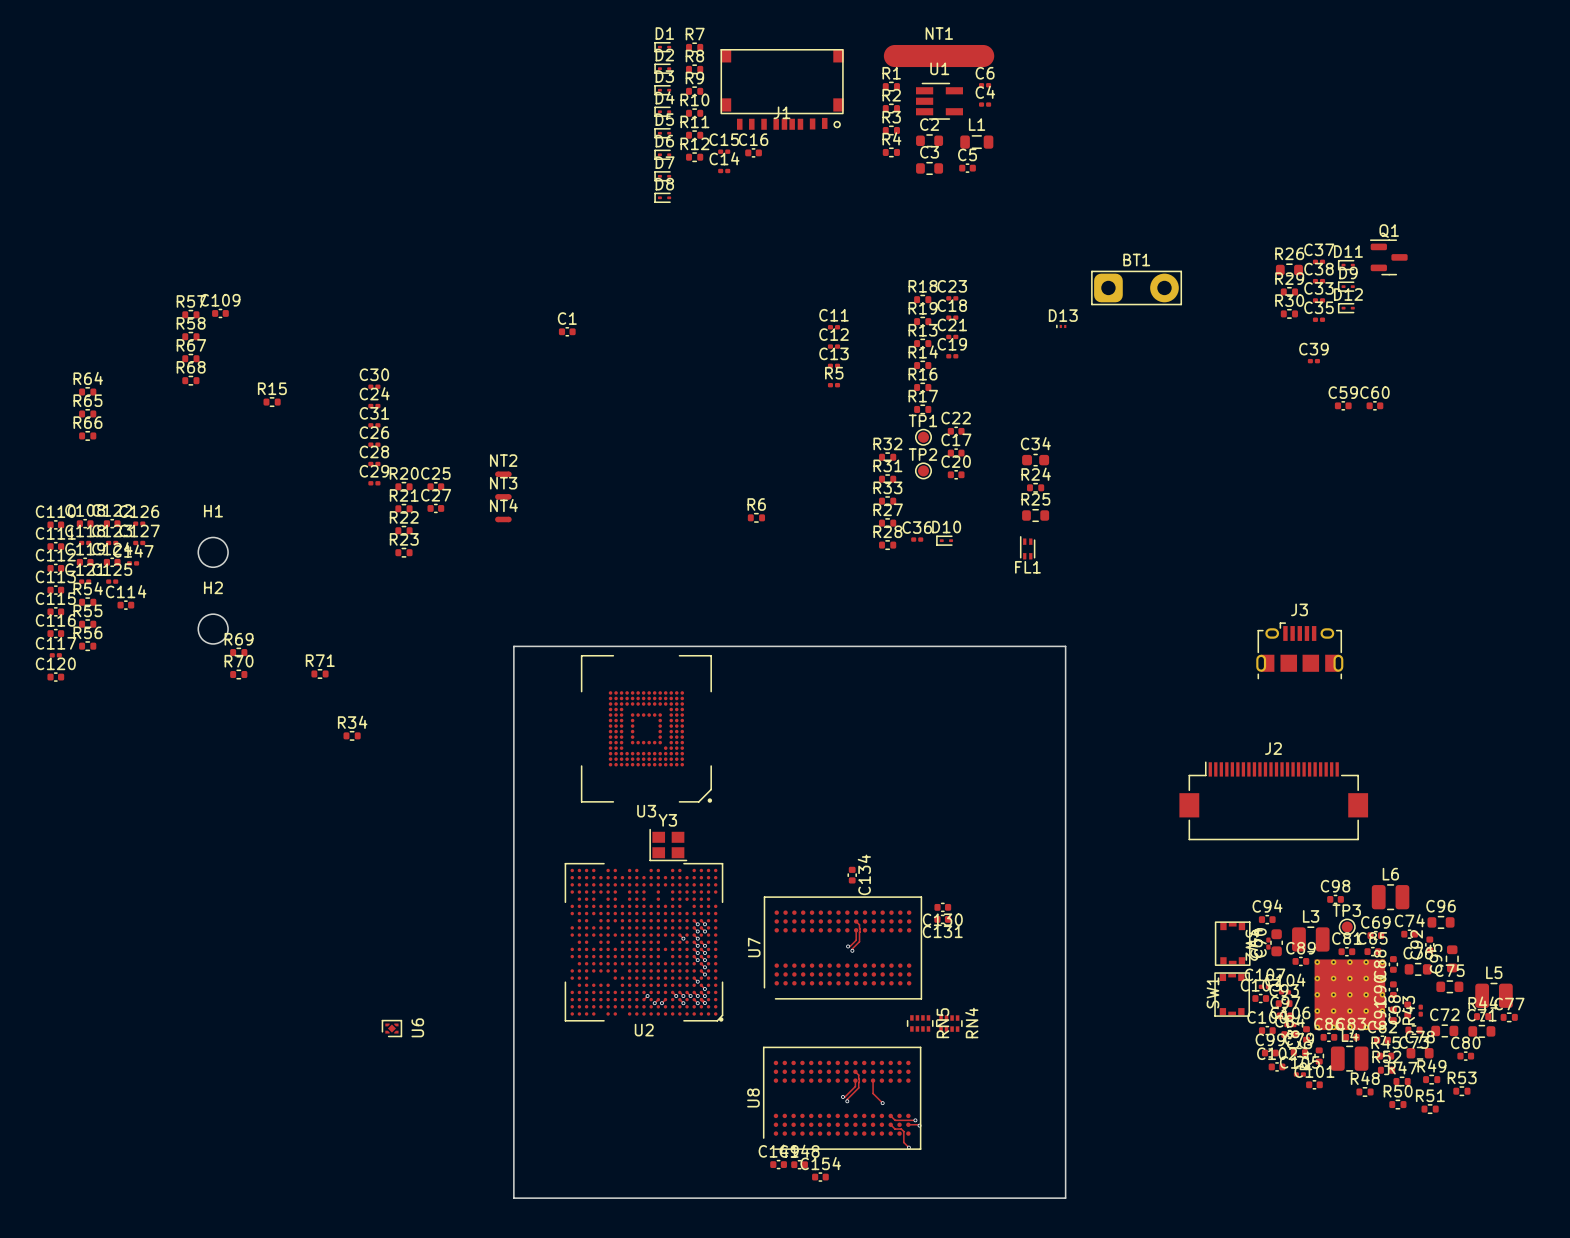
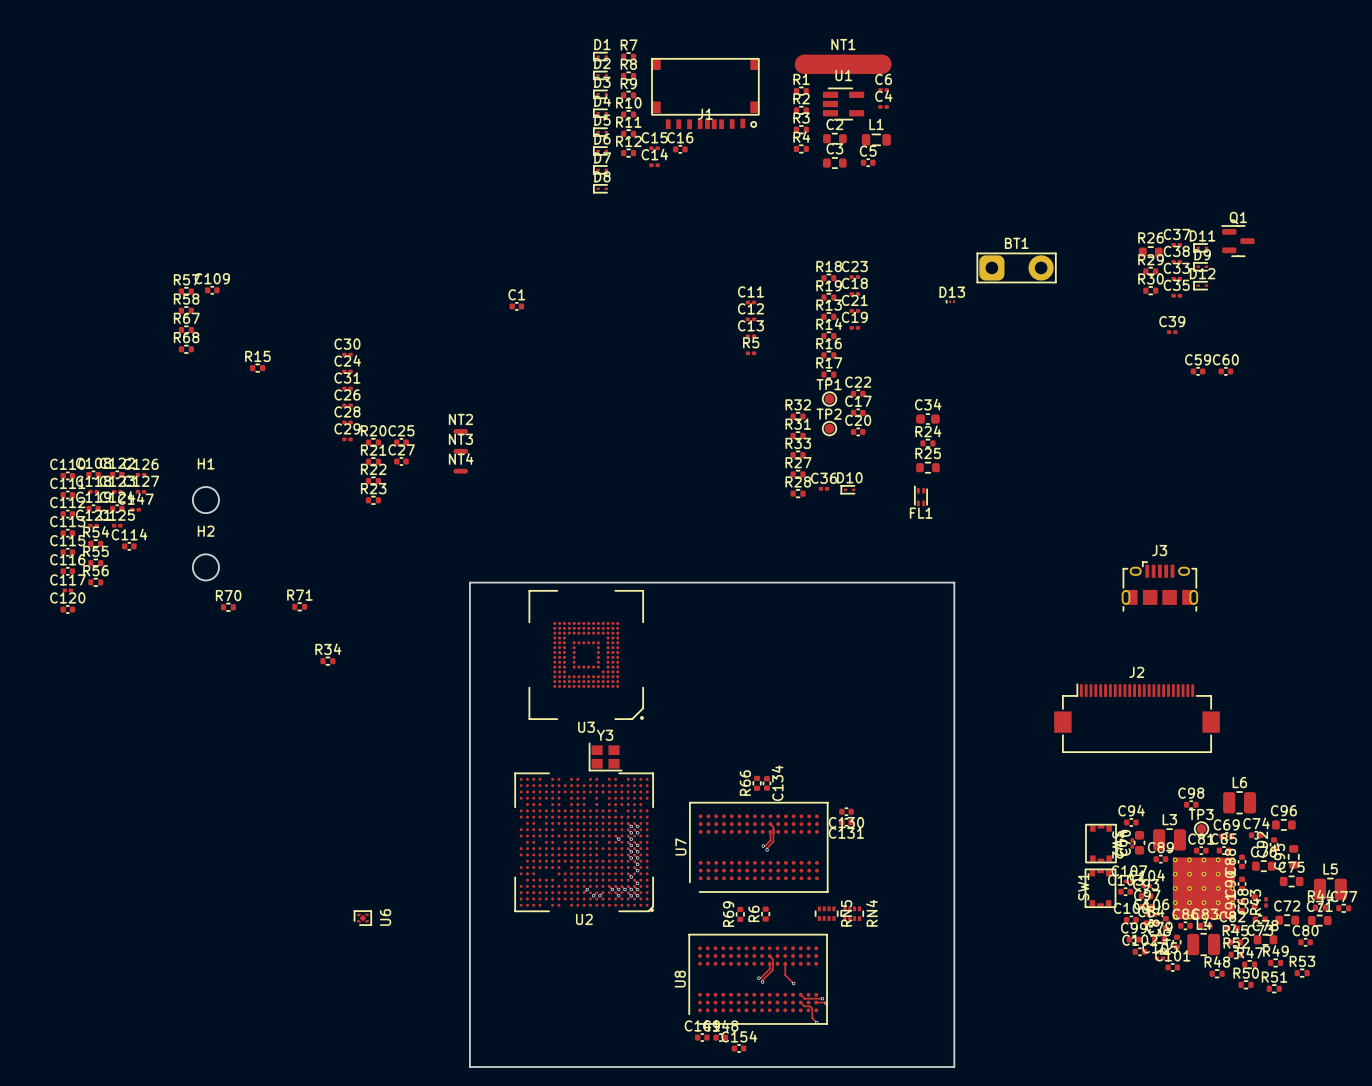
R64: (87, 392) -> none
R65: (87, 413) -> none
R66 rotation: 0° (87, 435) -> 90° clockwise (757, 783)
R66 position: (87, 435) -> (757, 783)
R6 rotation: 0° (756, 517) -> 90° clockwise (765, 914)
R6 position: (756, 517) -> (765, 914)
R69 rotation: 0° (238, 652) -> 90° clockwise (740, 914)
R69 position: (238, 652) -> (740, 914)

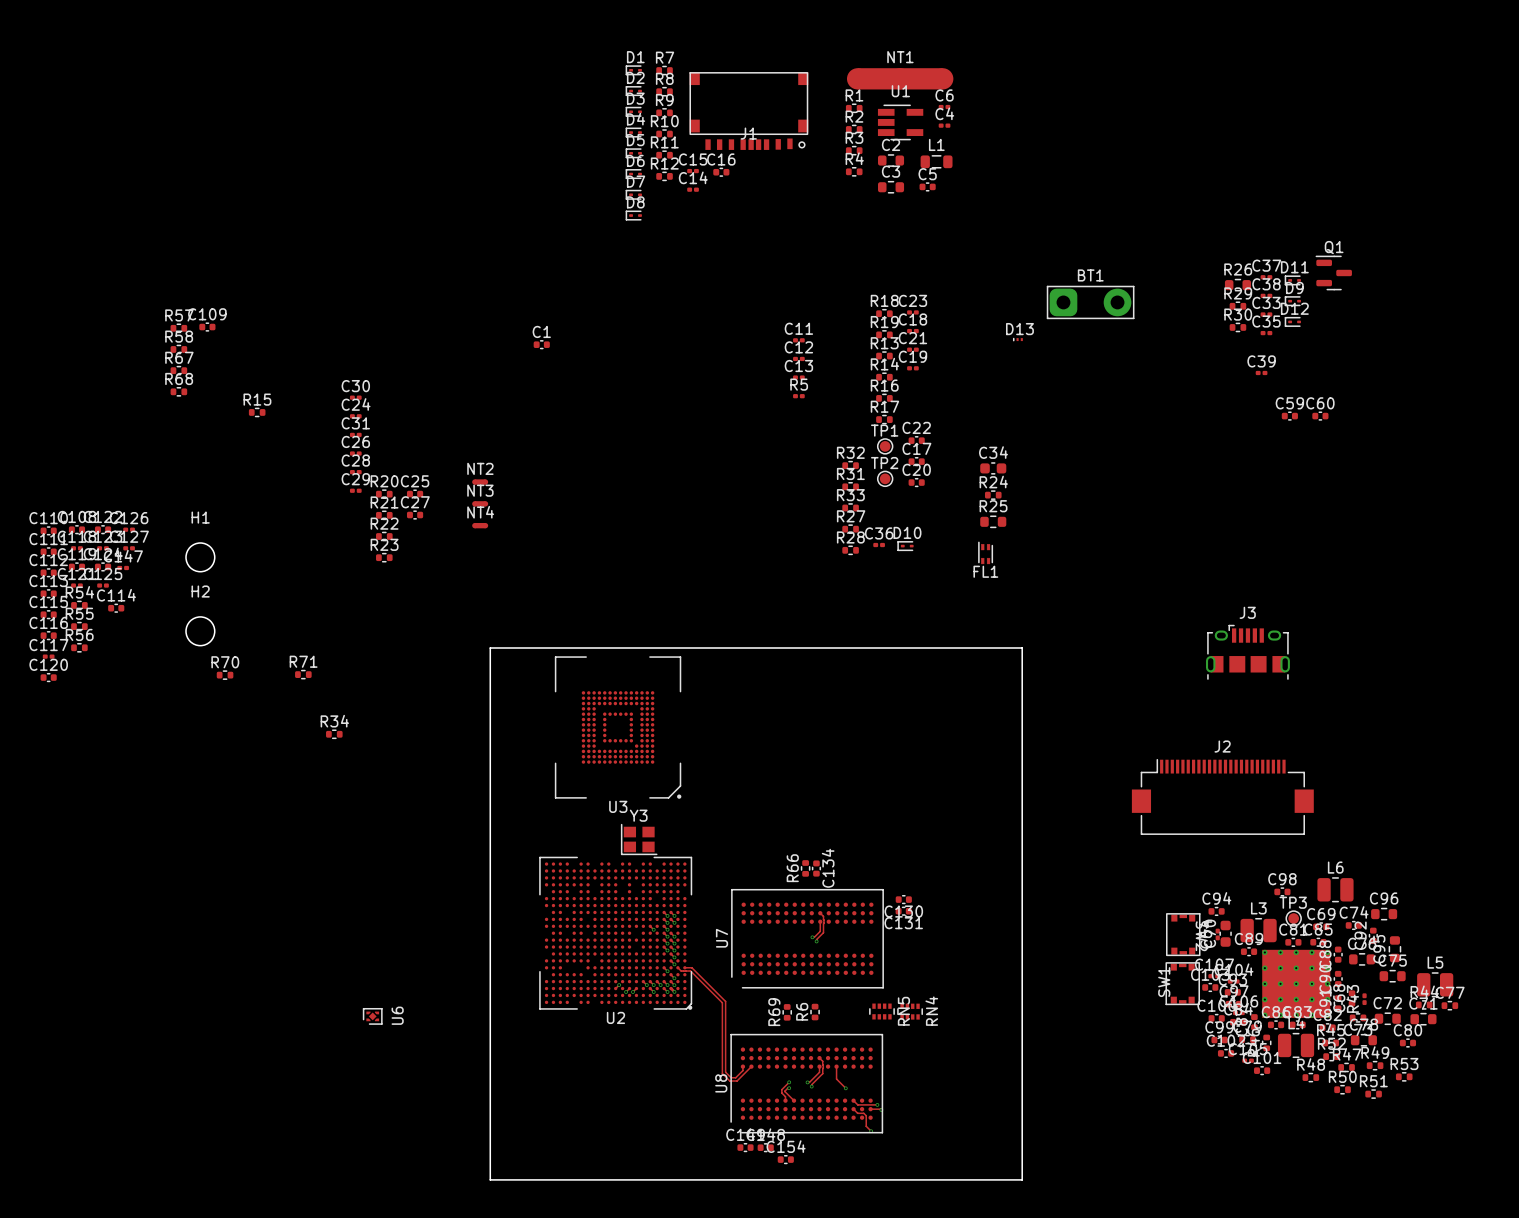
track: none -> (677, 967) (681, 971) (690, 971) (722, 1002) (722, 1073) (729, 1081) (737, 1081) (751, 1066)
track: none -> (684, 967) (691, 967) (725, 1001) (725, 1072) (731, 1077) (735, 1077) (742, 1070) (742, 1066)
track: none -> (789, 1082) (781, 1089) (785, 1100)
via: none -> (789, 1082)
track: none -> (789, 1088) (785, 1091) (794, 1100)
via: none -> (789, 1088)

